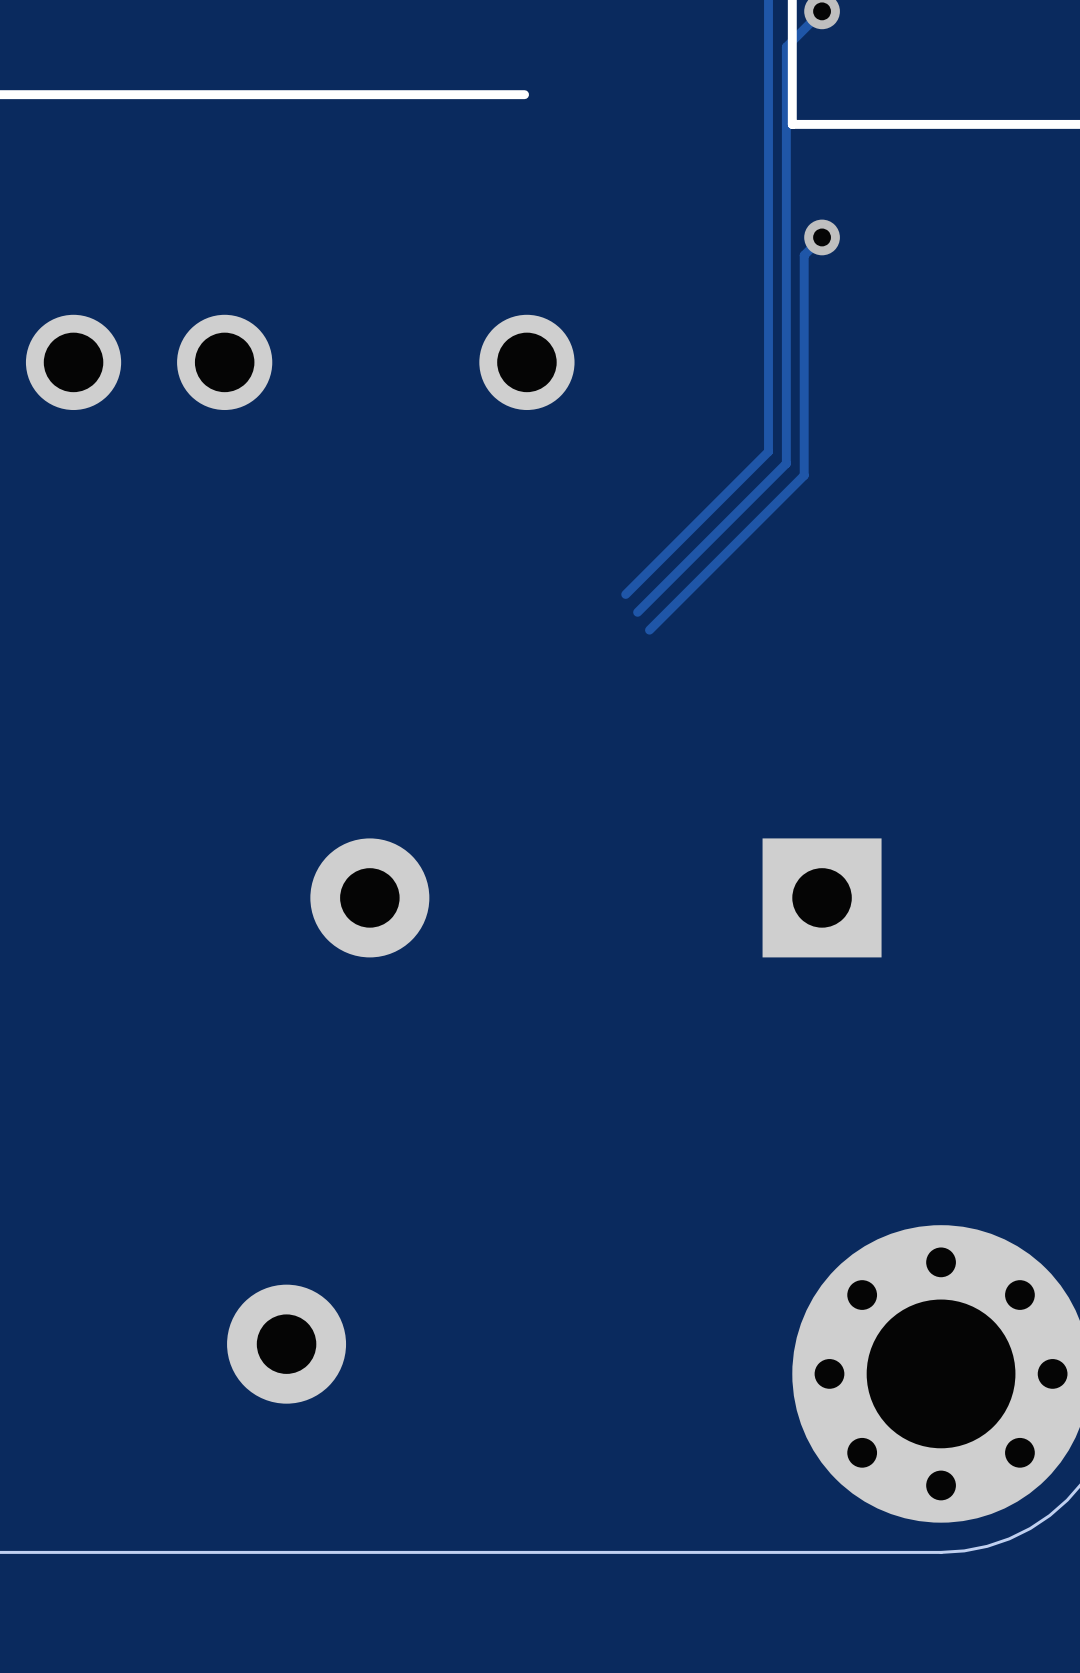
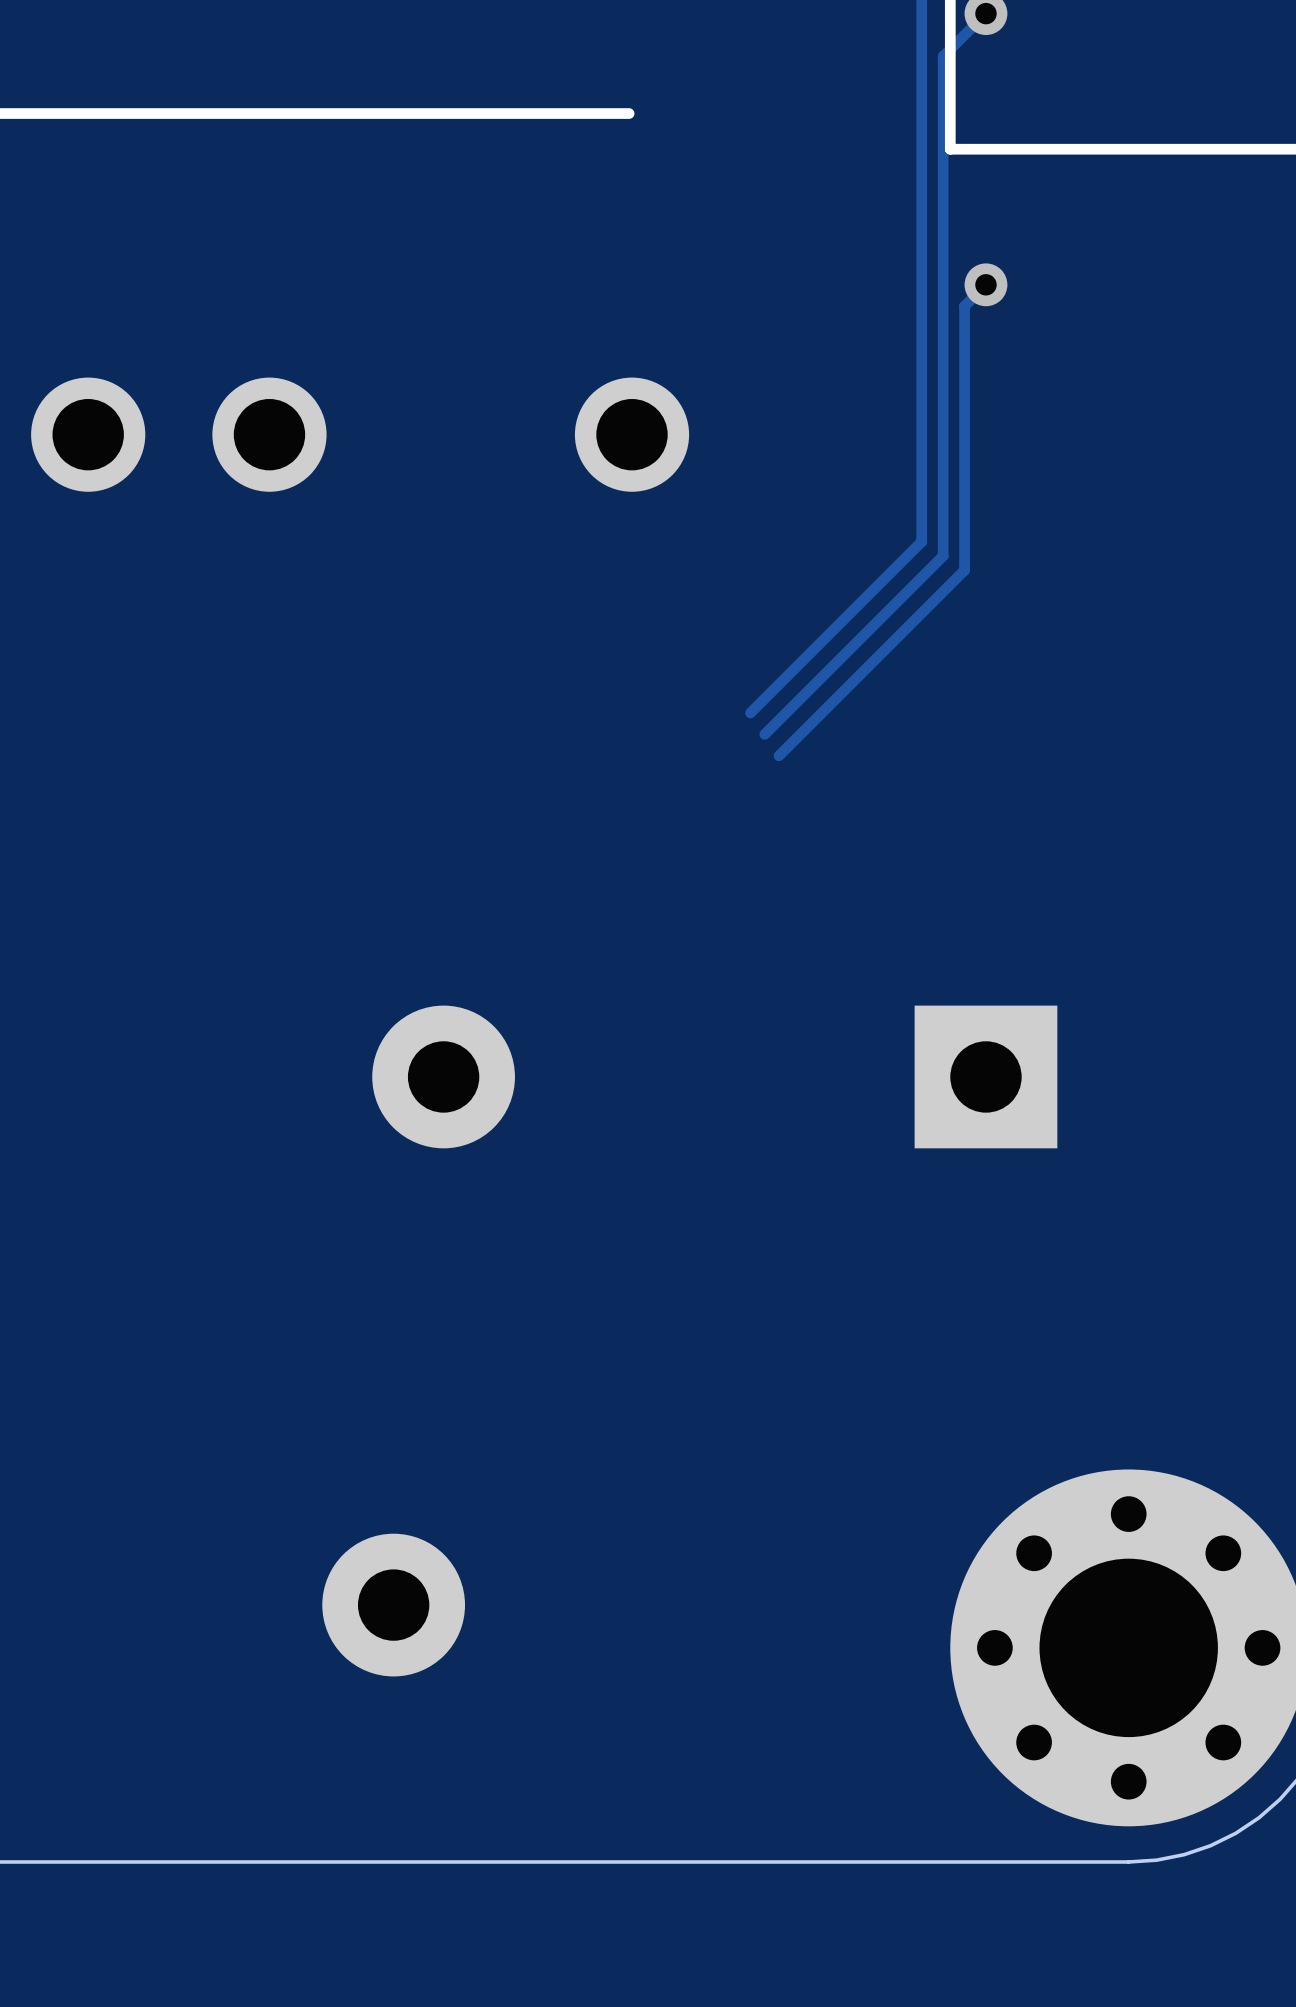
part position: (286, 1344) -> (393, 1605)

